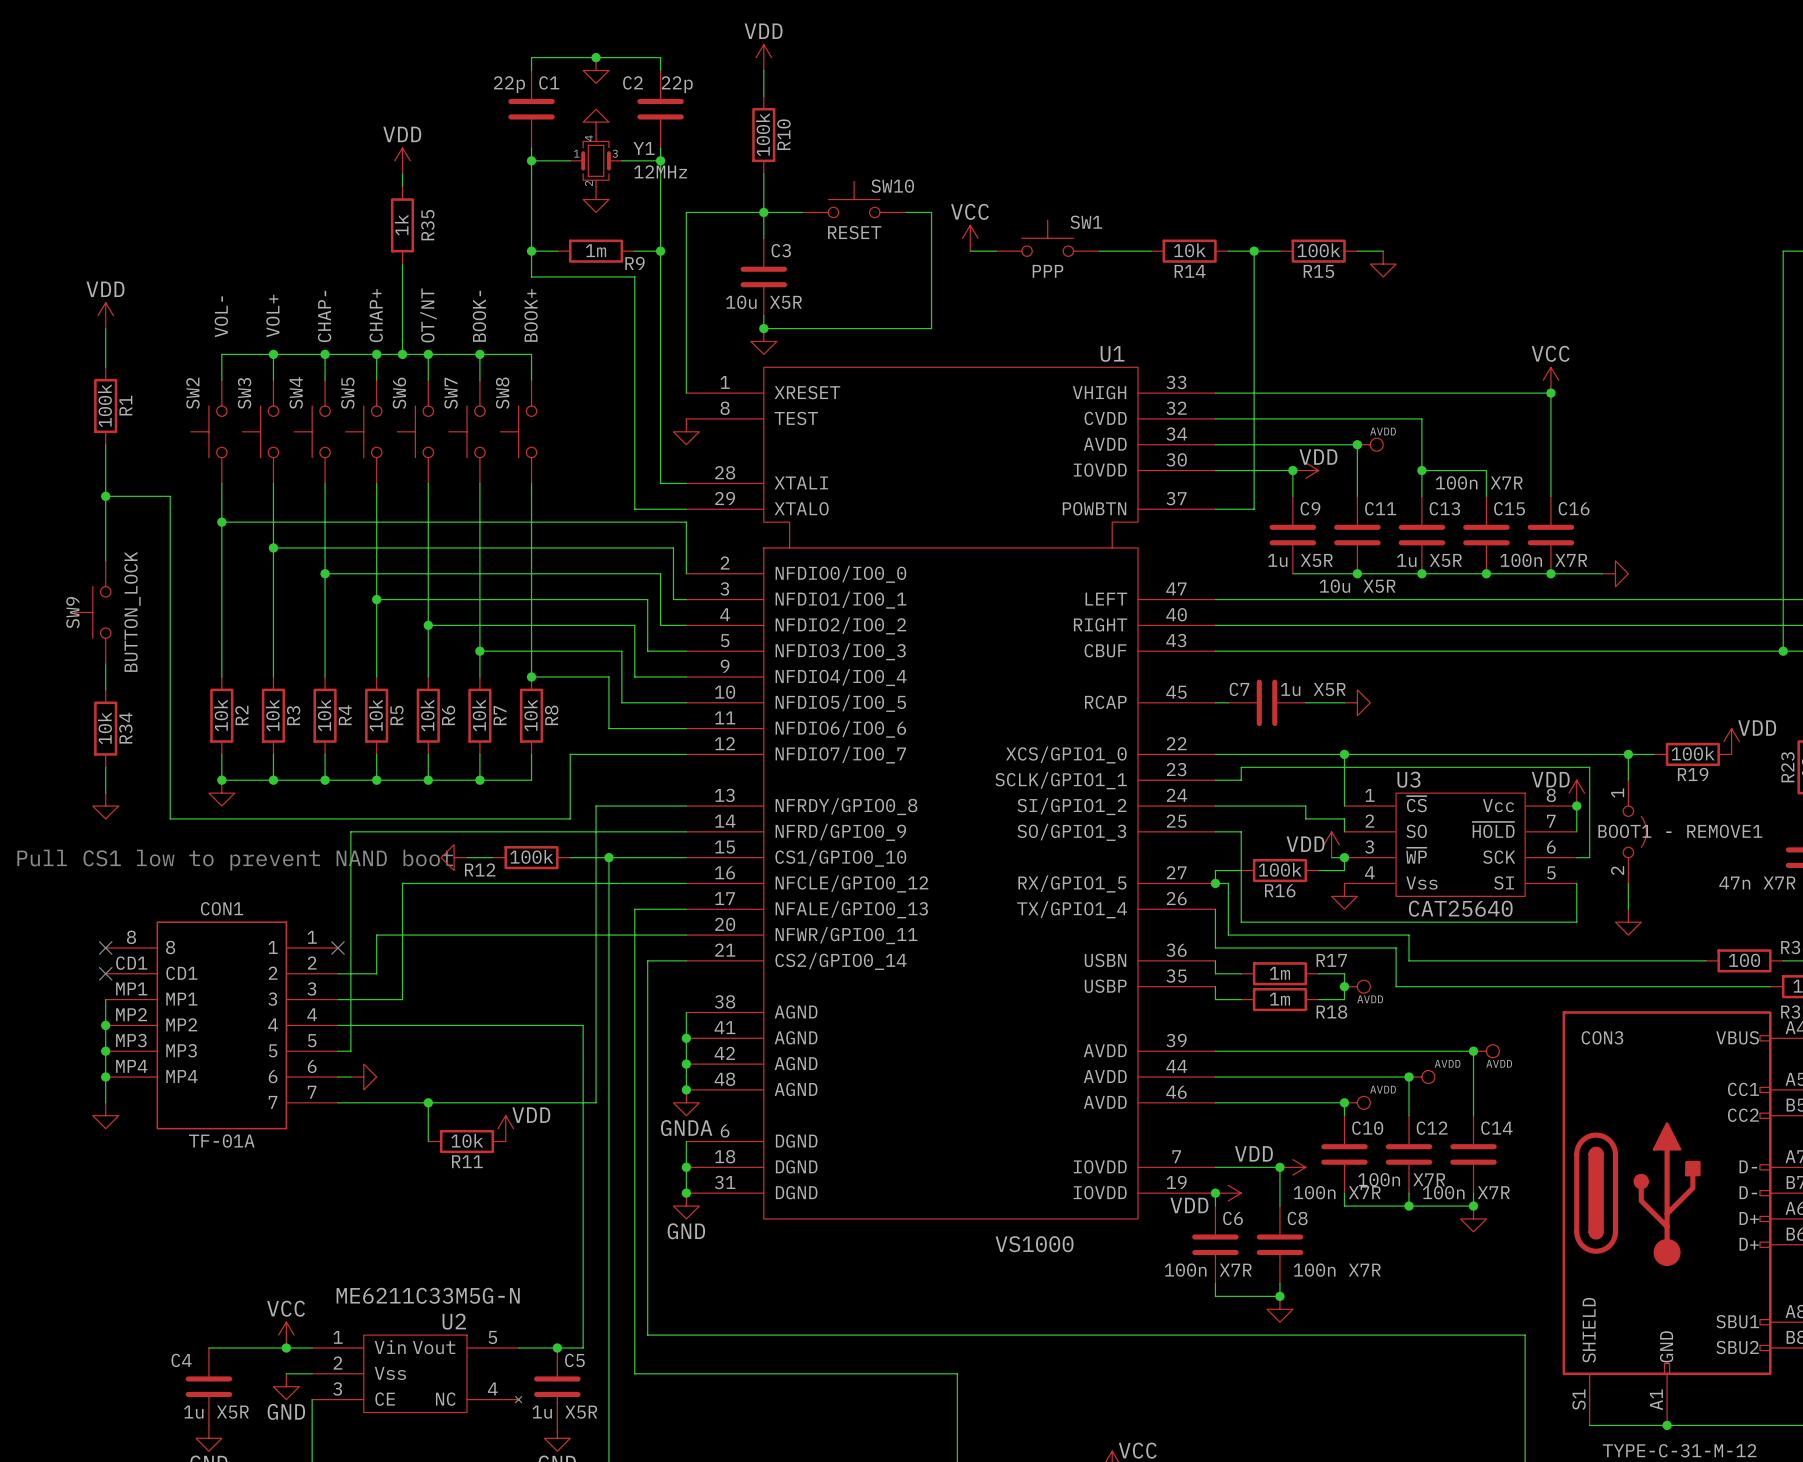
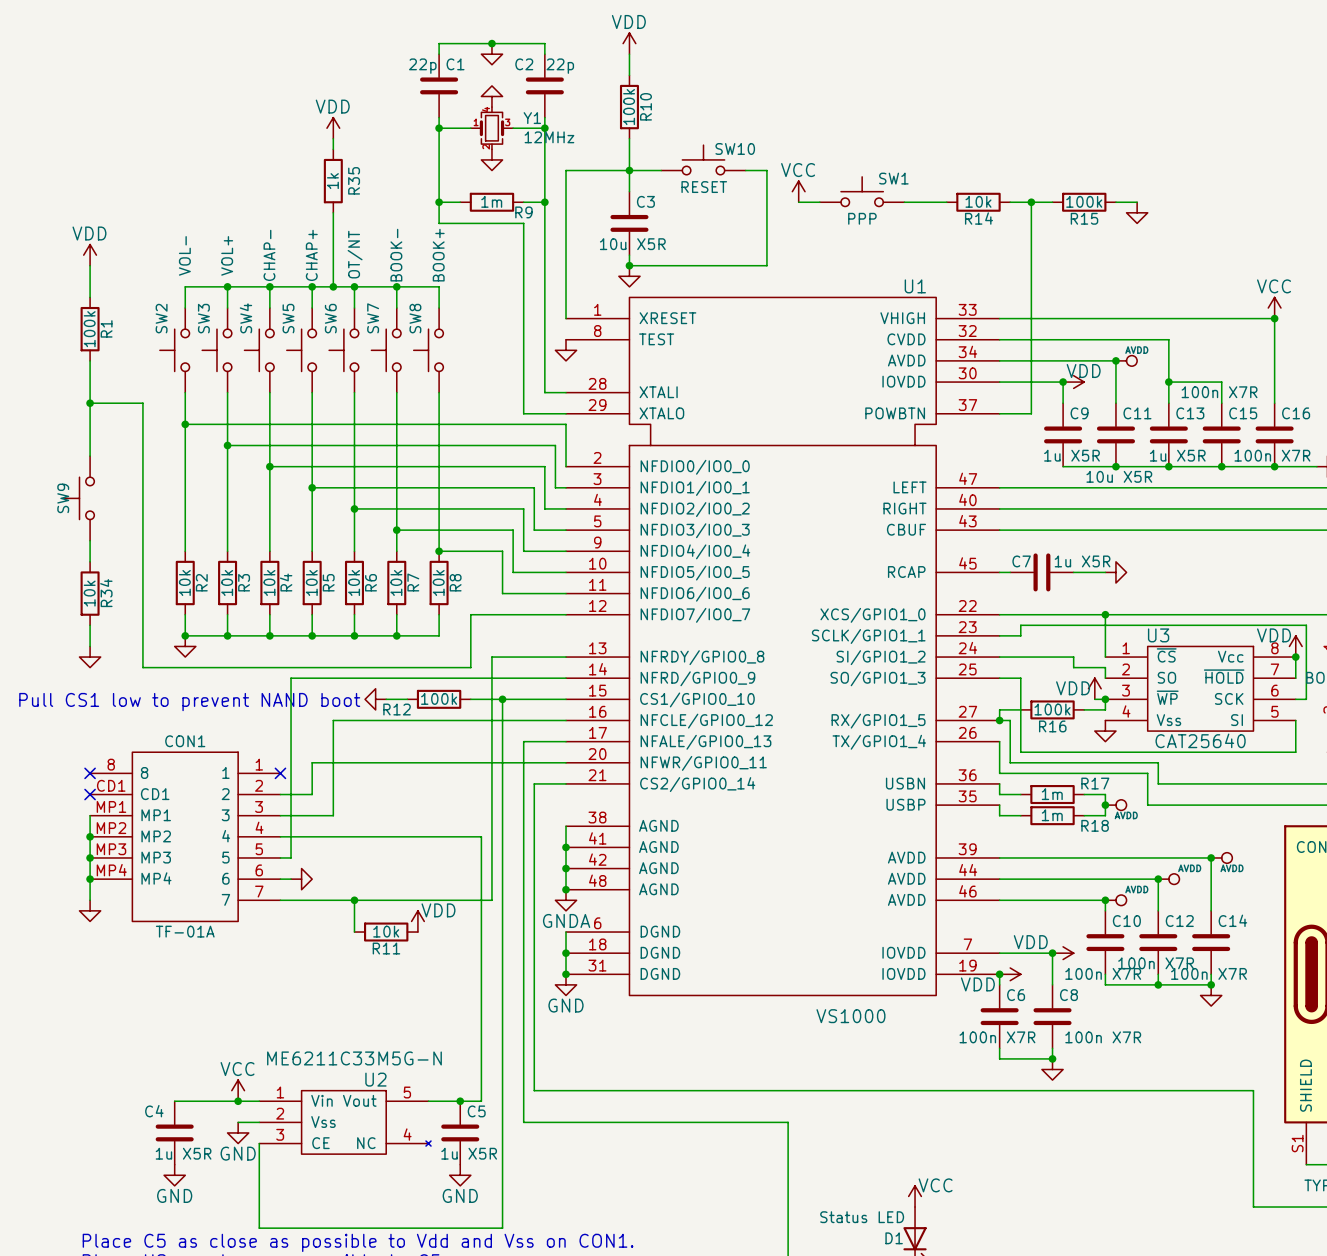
SW9 value: BUTTON_LOCK (132, 611) -> none

